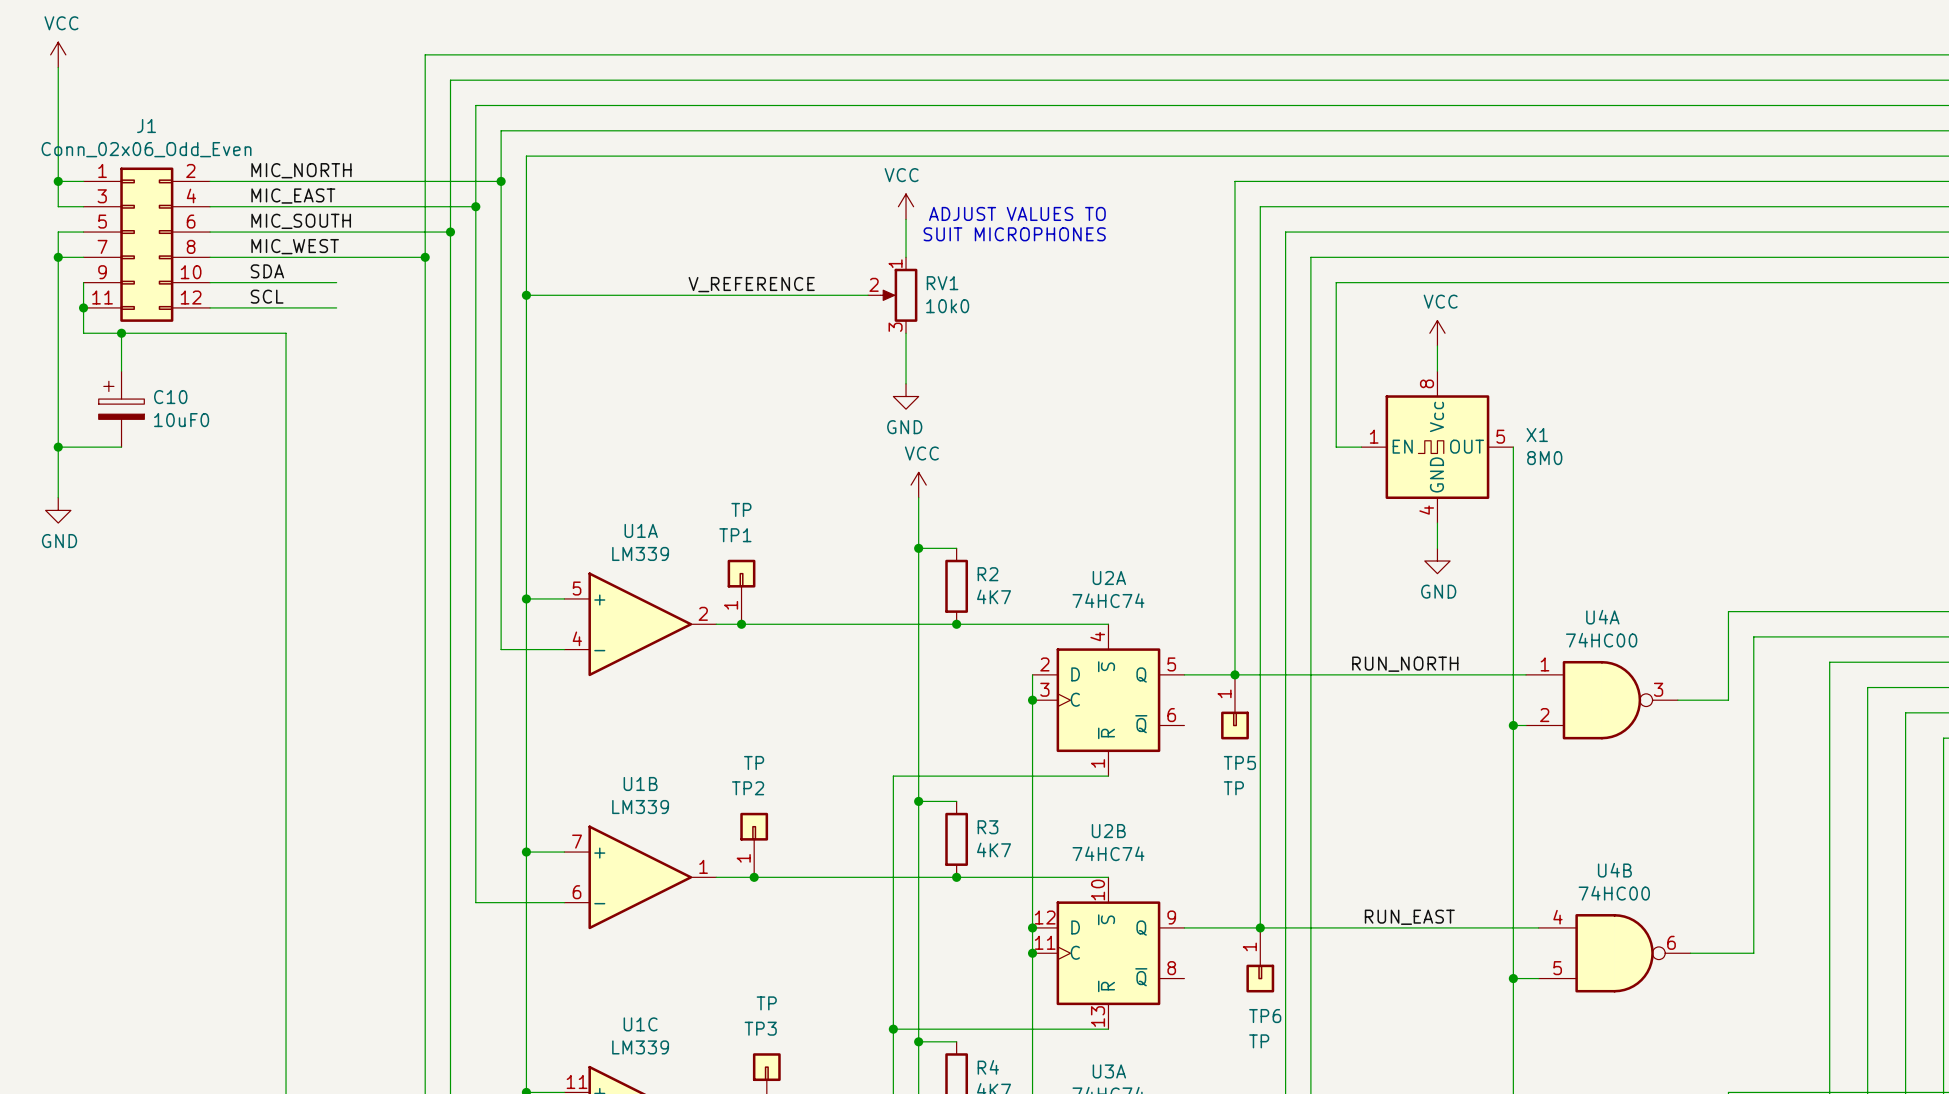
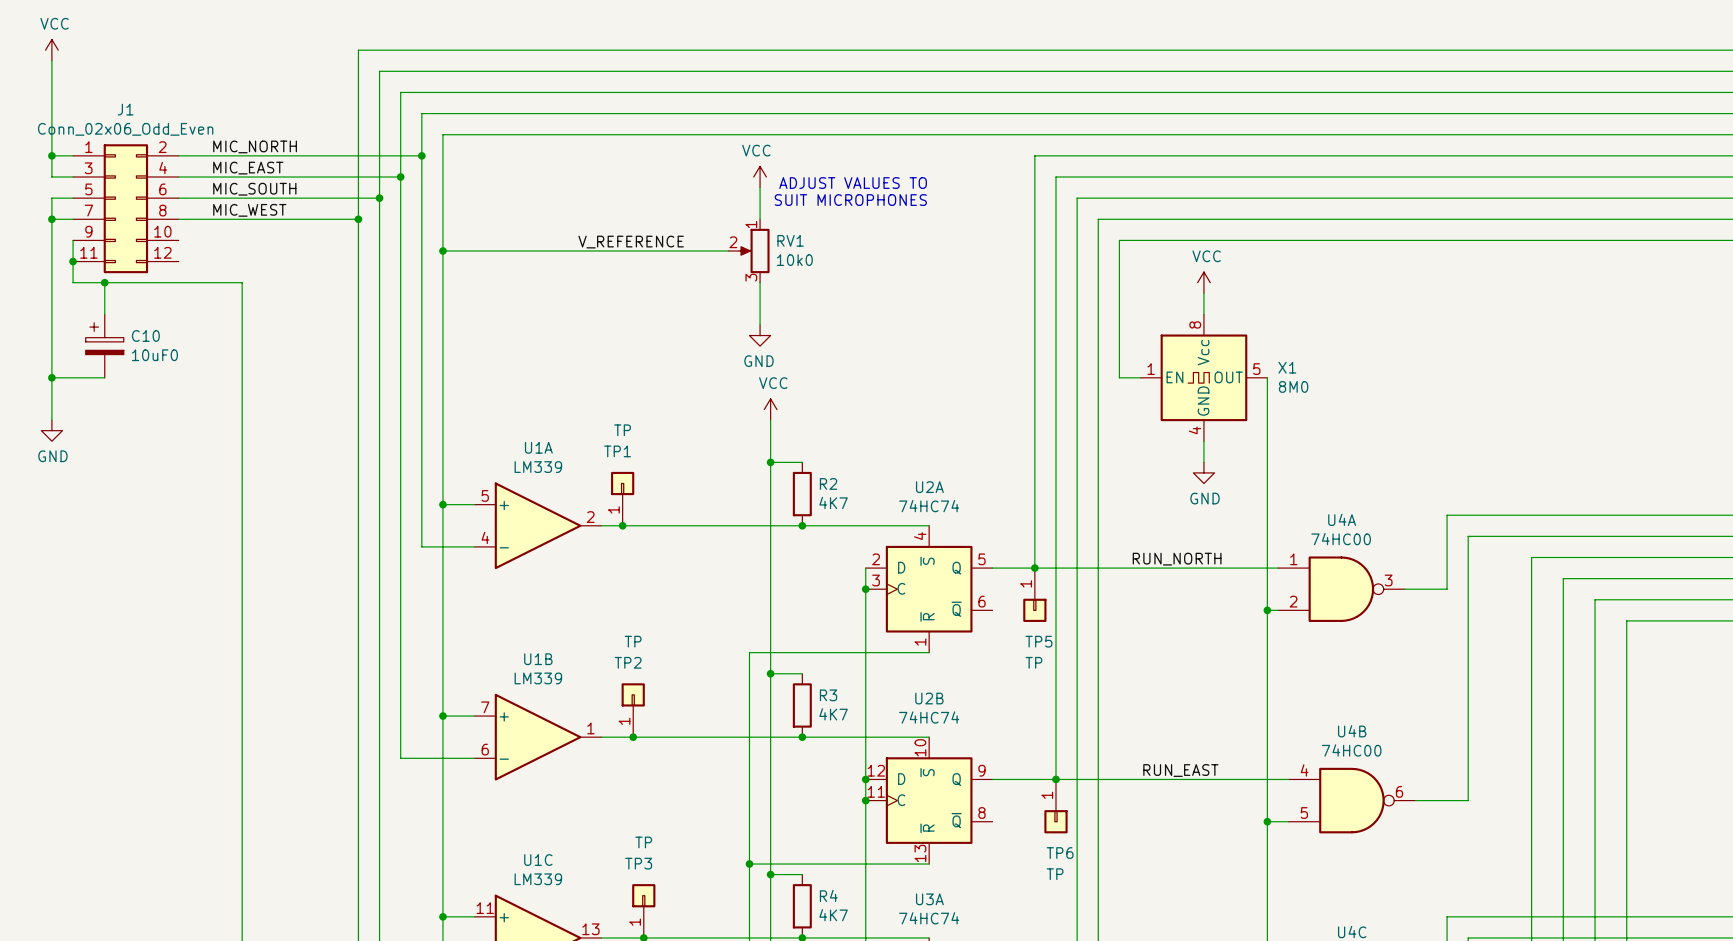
label: SDA (267, 271) -> none
wire: (210, 282) (336, 282) -> none
label: SCL (267, 296) -> none
wire: (210, 307) (336, 307) -> none

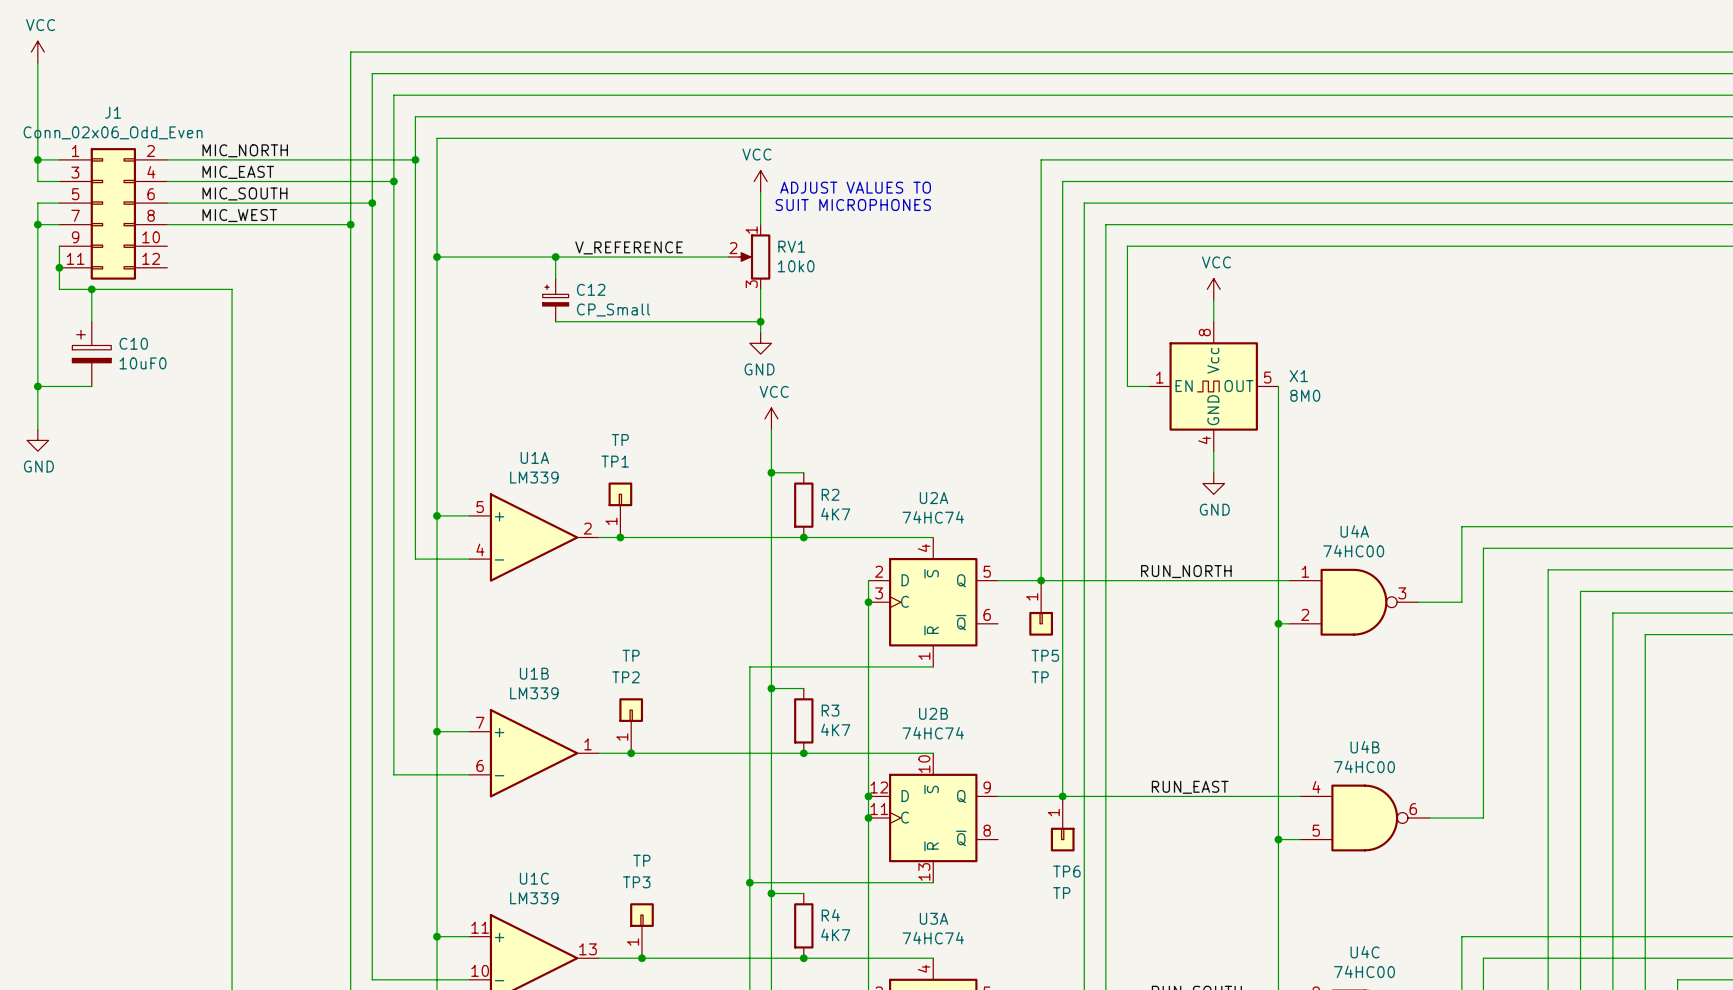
wire: none -> (555, 257) (555, 278)
junction: none -> (555, 257)
C12: none -> CP_Small (555, 300)
wire: none -> (555, 321) (760, 321)
junction: none -> (760, 321)

